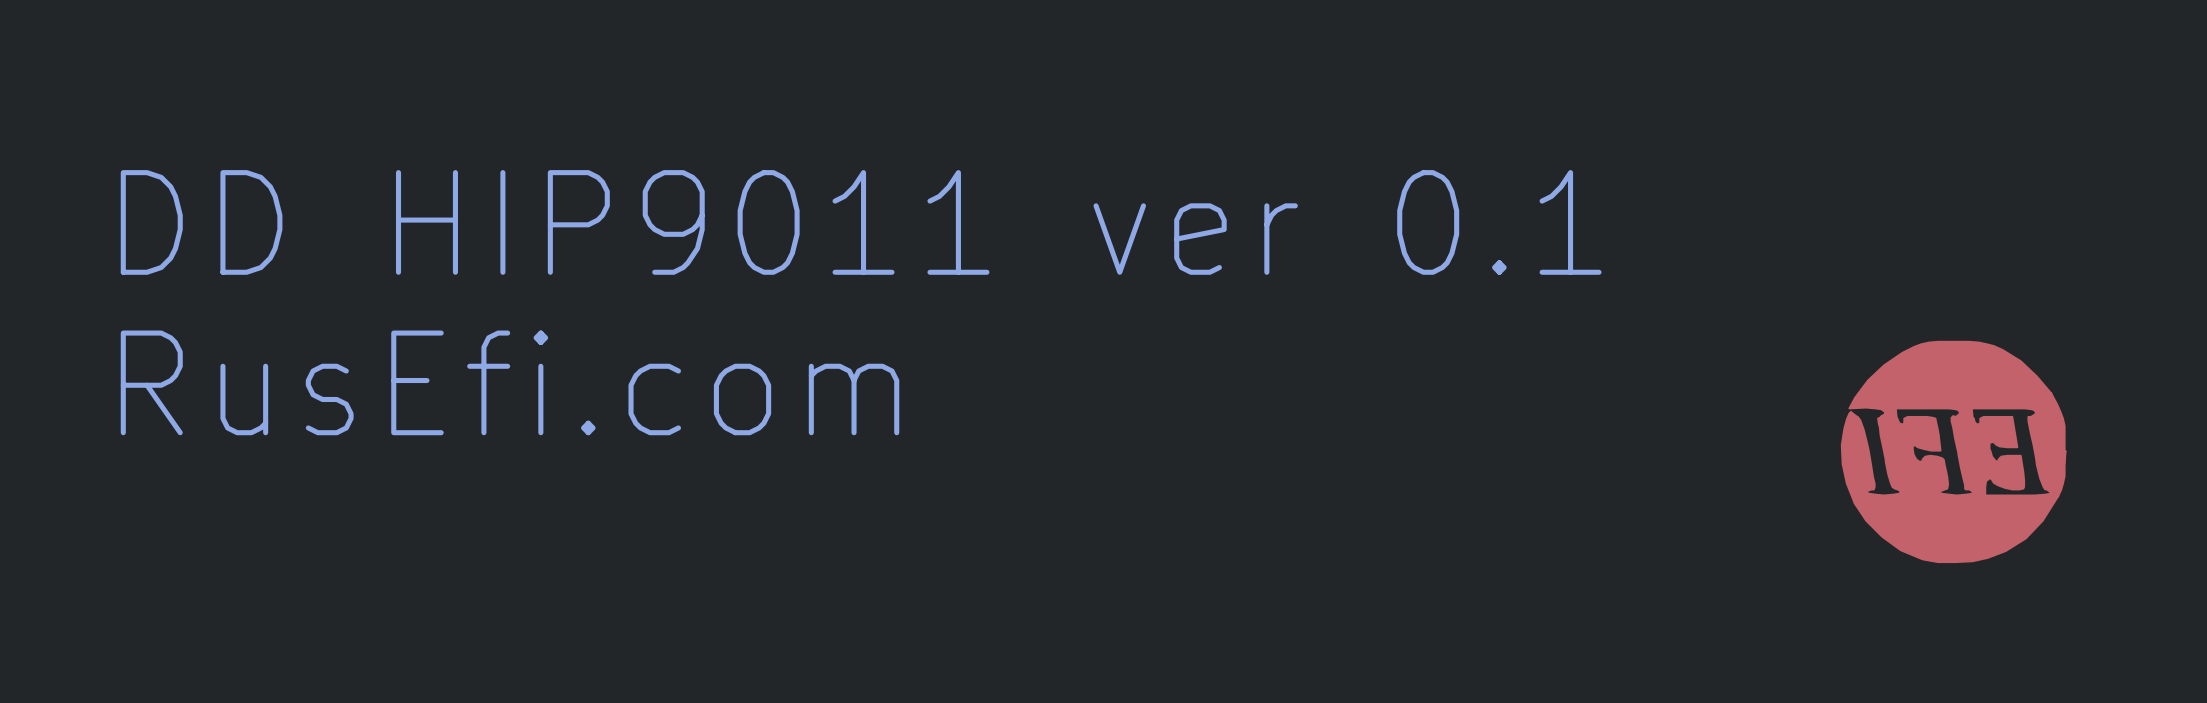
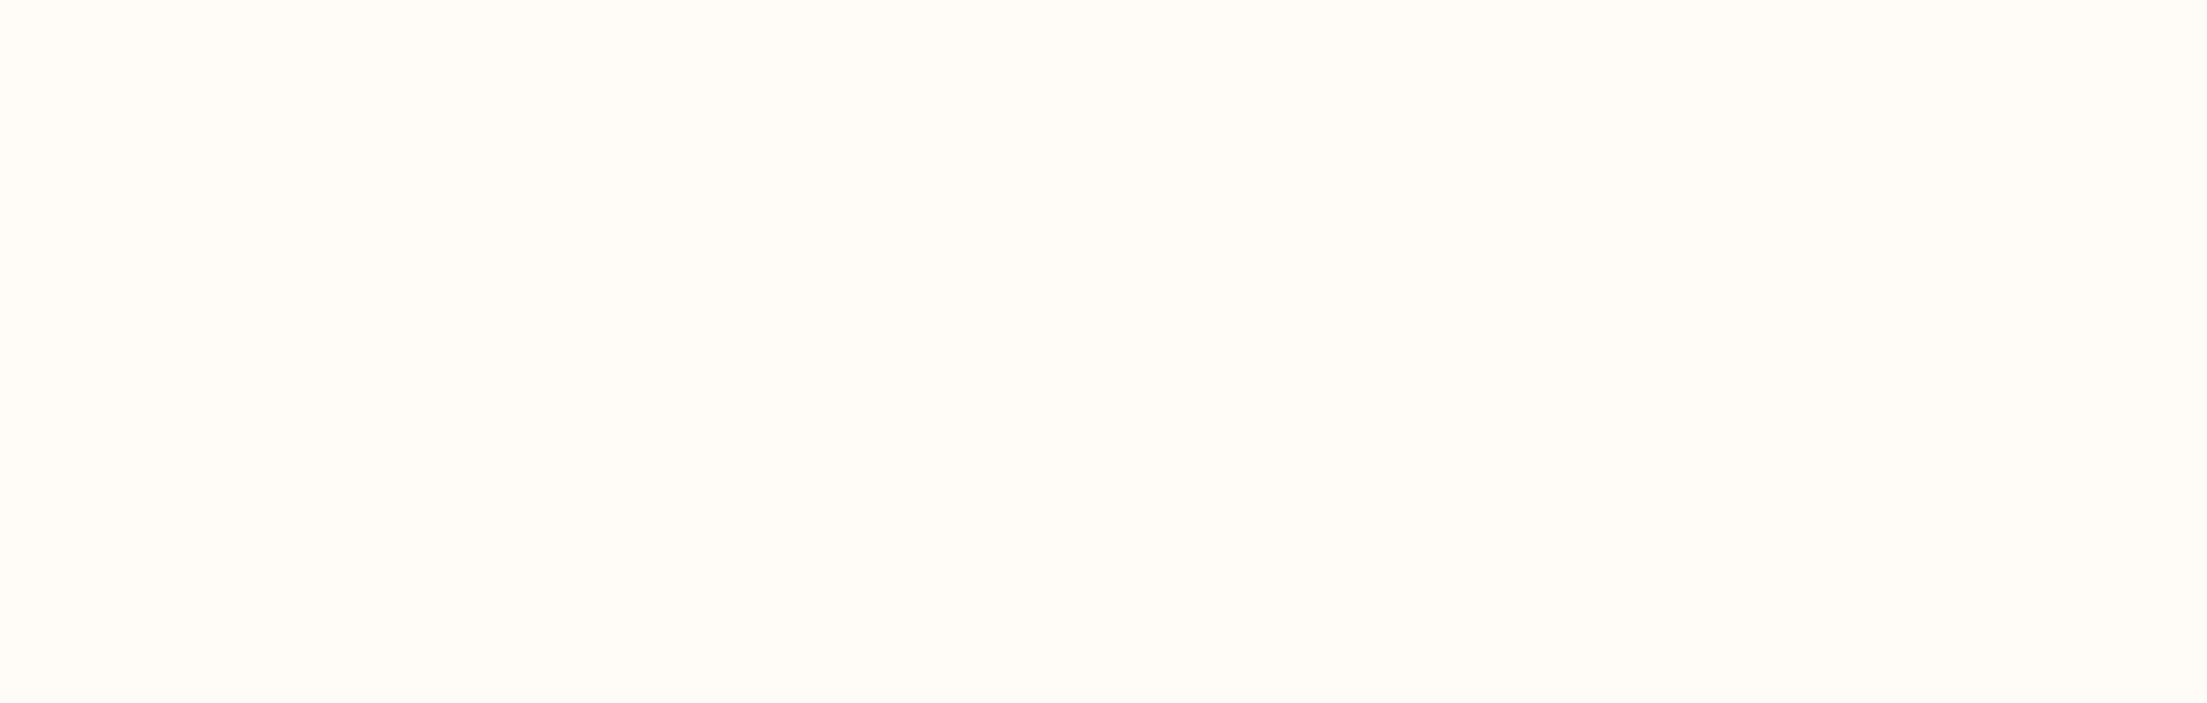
text: DD HIP9011 ver 0.1 (861, 222) -> none
text: RusEfi.com (510, 382) -> none
part: (1953, 451) -> none

